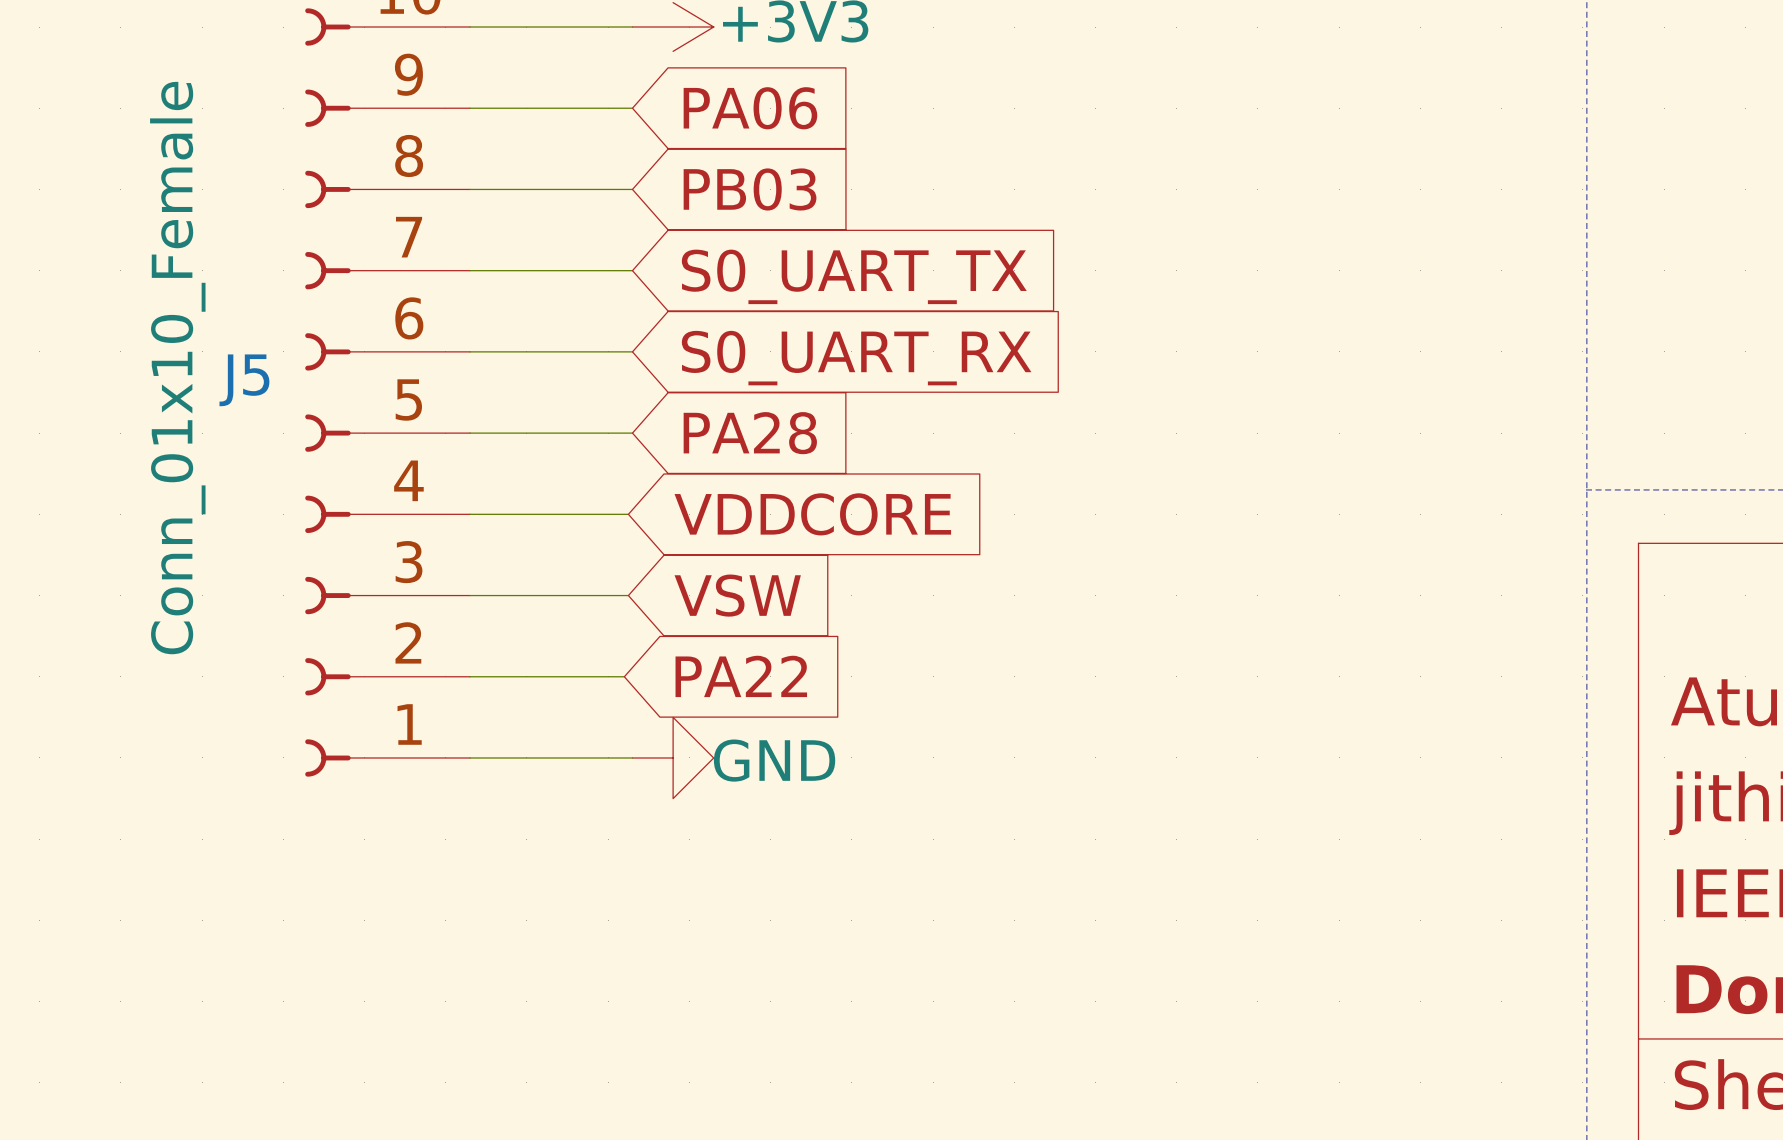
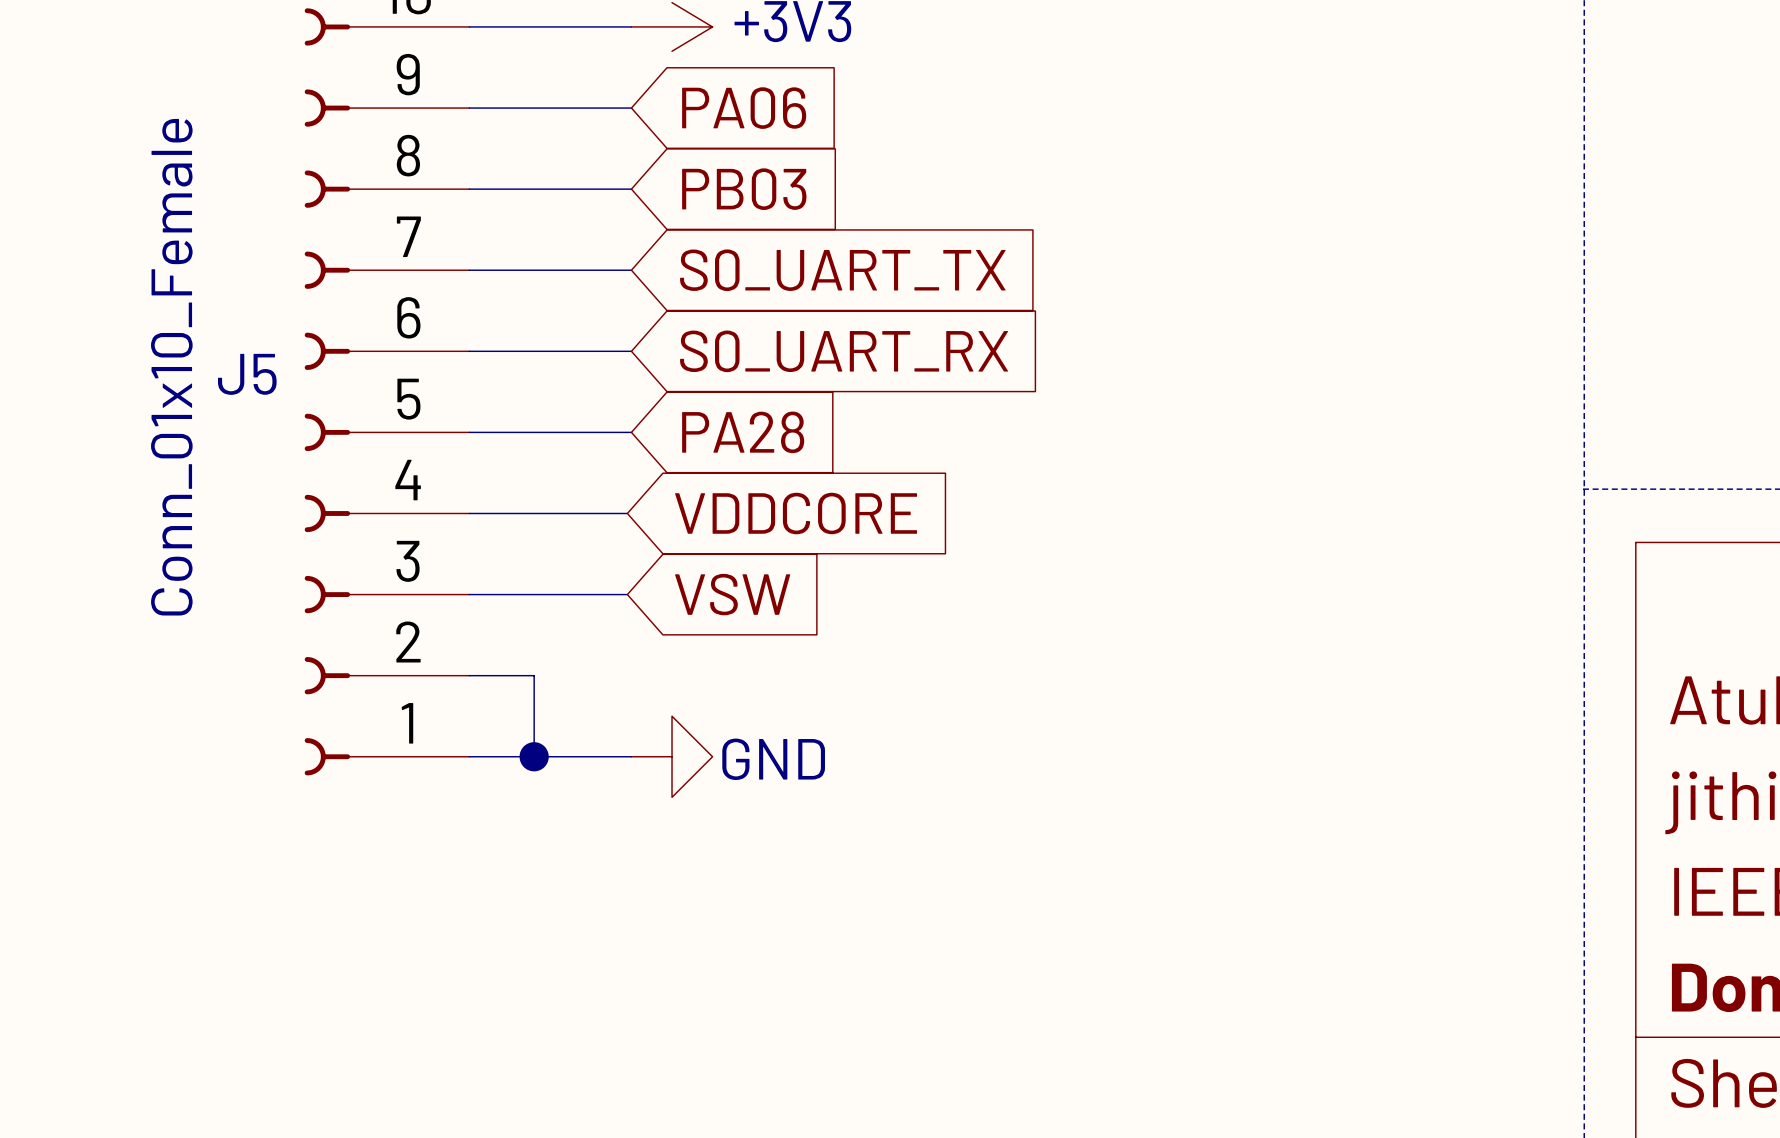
wire: (535, 676) (624, 676) -> (534, 675) (534, 756)
global label: PA22 (741, 676) -> none
junction: none -> (534, 756)

